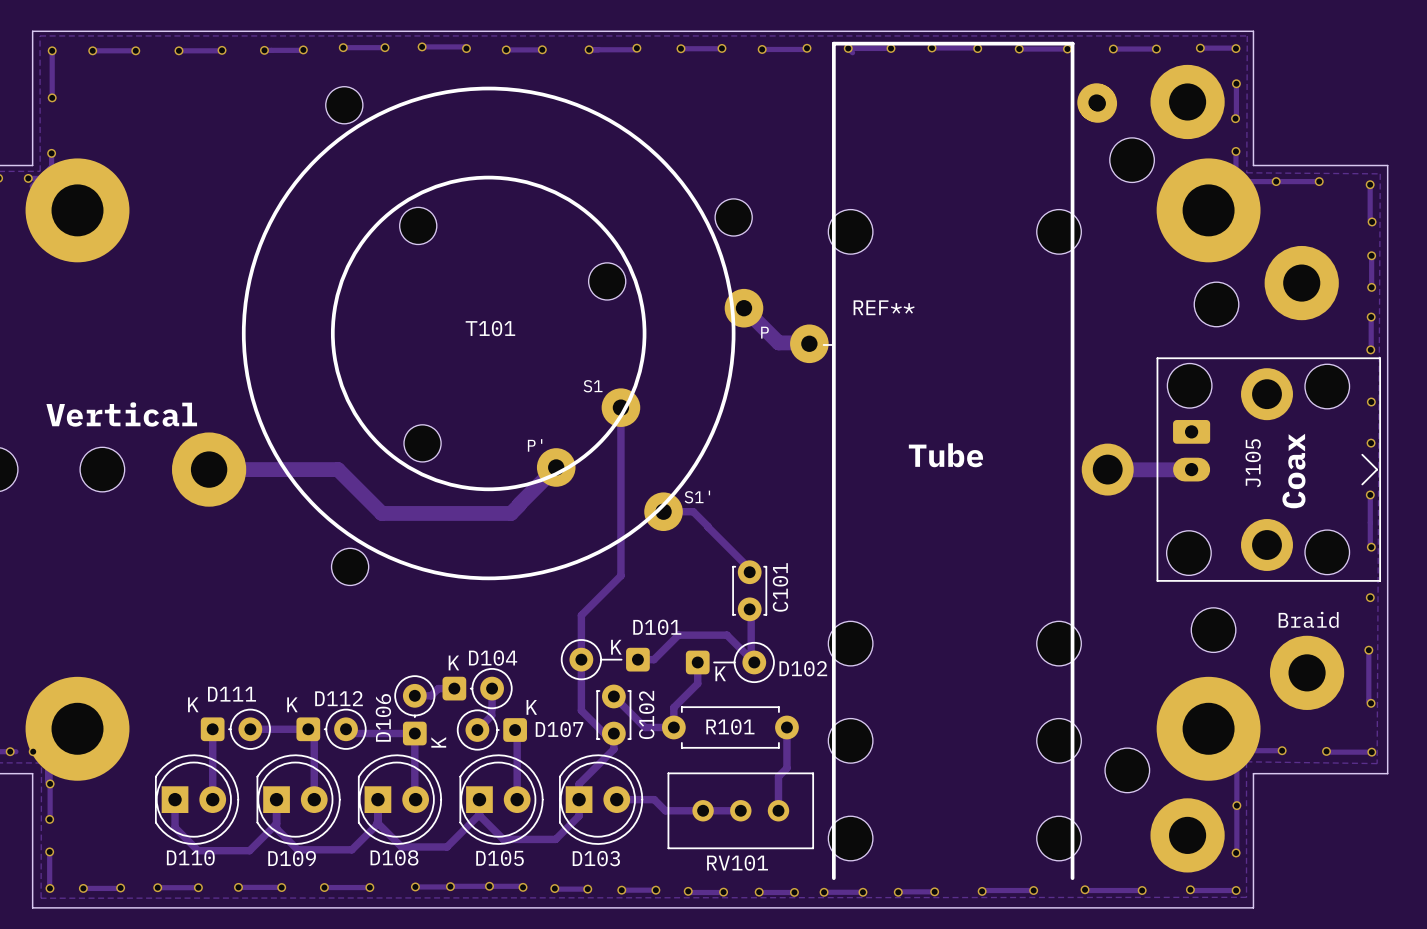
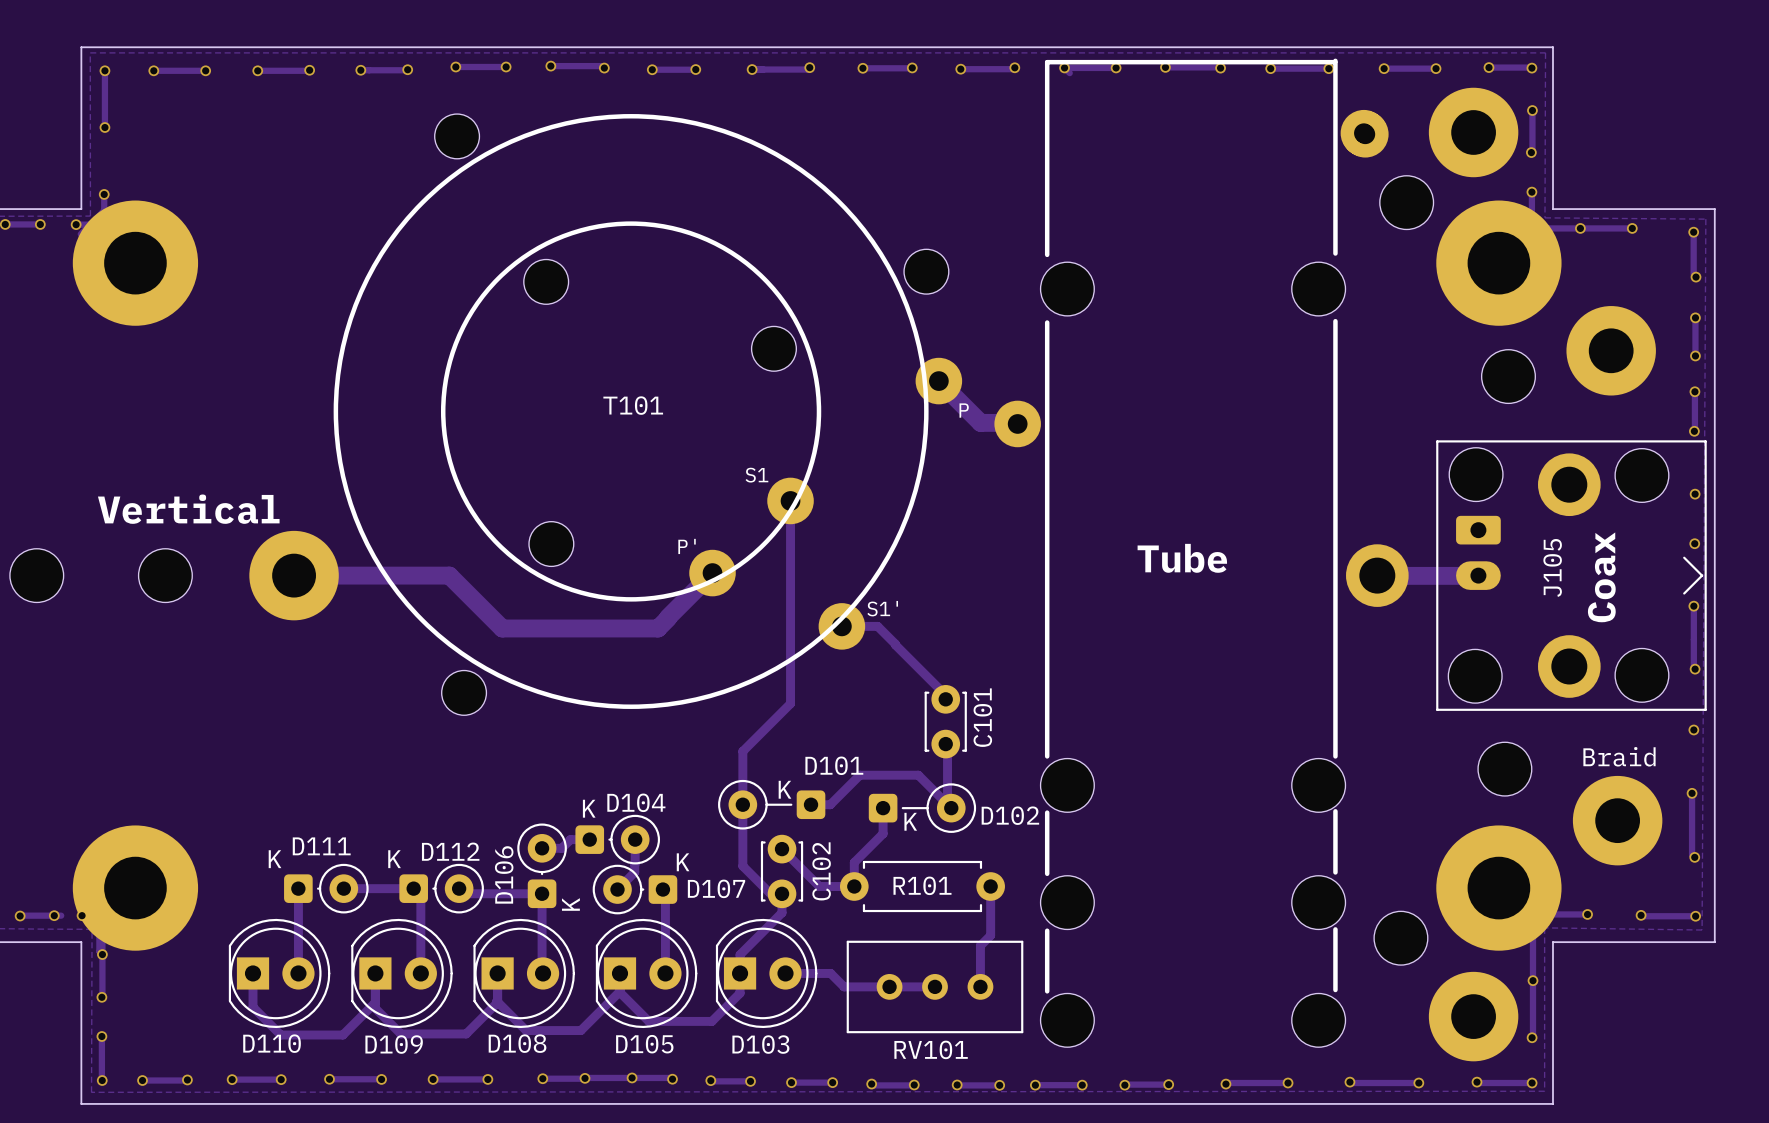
part: none -> (1191, 552)
REF**: (953, 460) -> none

